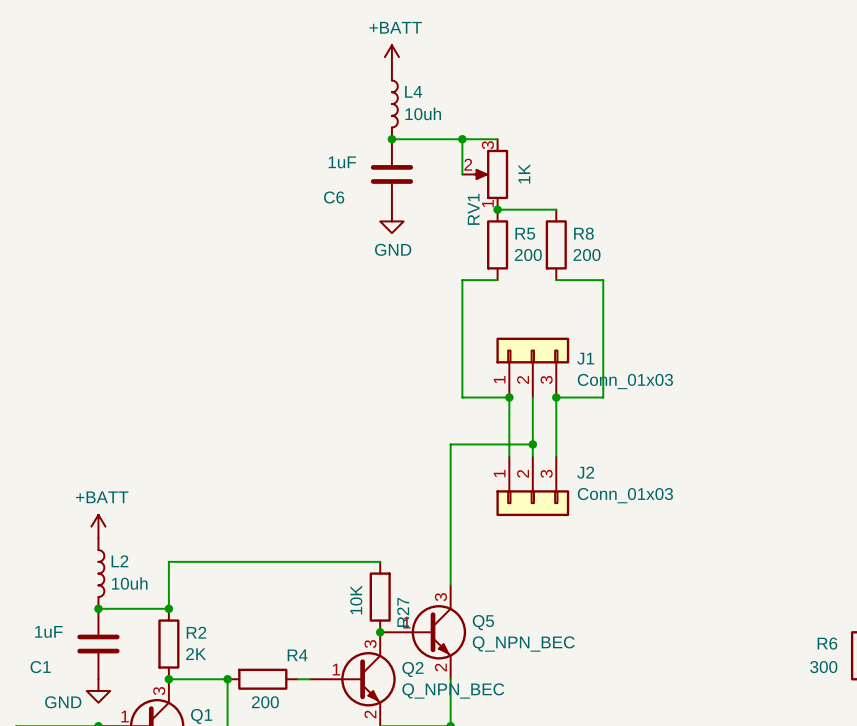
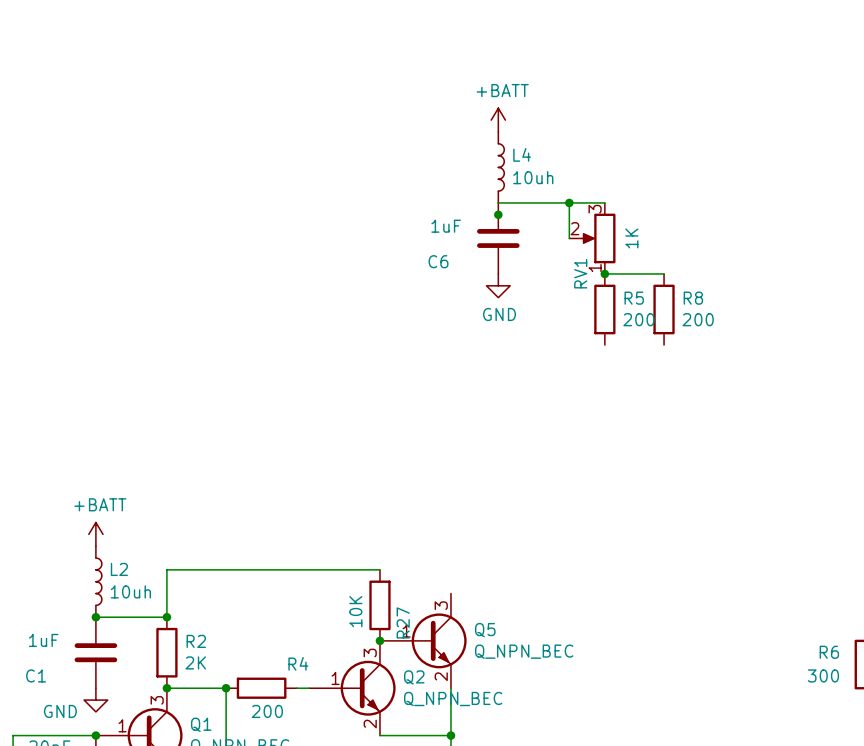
power symbol position: +BATT (391, 57) -> +BATT (498, 120)
L4 position: (394, 104) -> (501, 167)
wire: (391, 139) (497, 139) -> (498, 202) (604, 202)
junction: (391, 139) -> none
wire: (462, 139) (462, 174) -> (569, 202) (569, 238)
junction: (462, 139) -> none
C6 position: (391, 174) -> (498, 238)
RV1 position: (485, 174) -> (592, 238)
junction: none -> (569, 202)
wire: (497, 209) (556, 209) -> (604, 273) (664, 273)
power symbol position: GND (391, 221) -> GND (498, 285)
R5 position: (497, 244) -> (604, 309)
R8 position: (556, 244) -> (664, 309)
junction: none -> (604, 273)
wire: (497, 280) (462, 280) (462, 397) (509, 397) (509, 456) -> none
wire: (556, 280) (603, 280) (603, 397) (556, 397) (556, 456) -> none
J1: Conn_01x03 (532, 367) -> none
junction: (509, 397) -> none
wire: (532, 397) (532, 456) -> none
junction: (556, 397) -> none
wire: (532, 444) (450, 444) (450, 585) -> none
junction: (532, 444) -> none
J2: Conn_01x03 (532, 486) -> none

